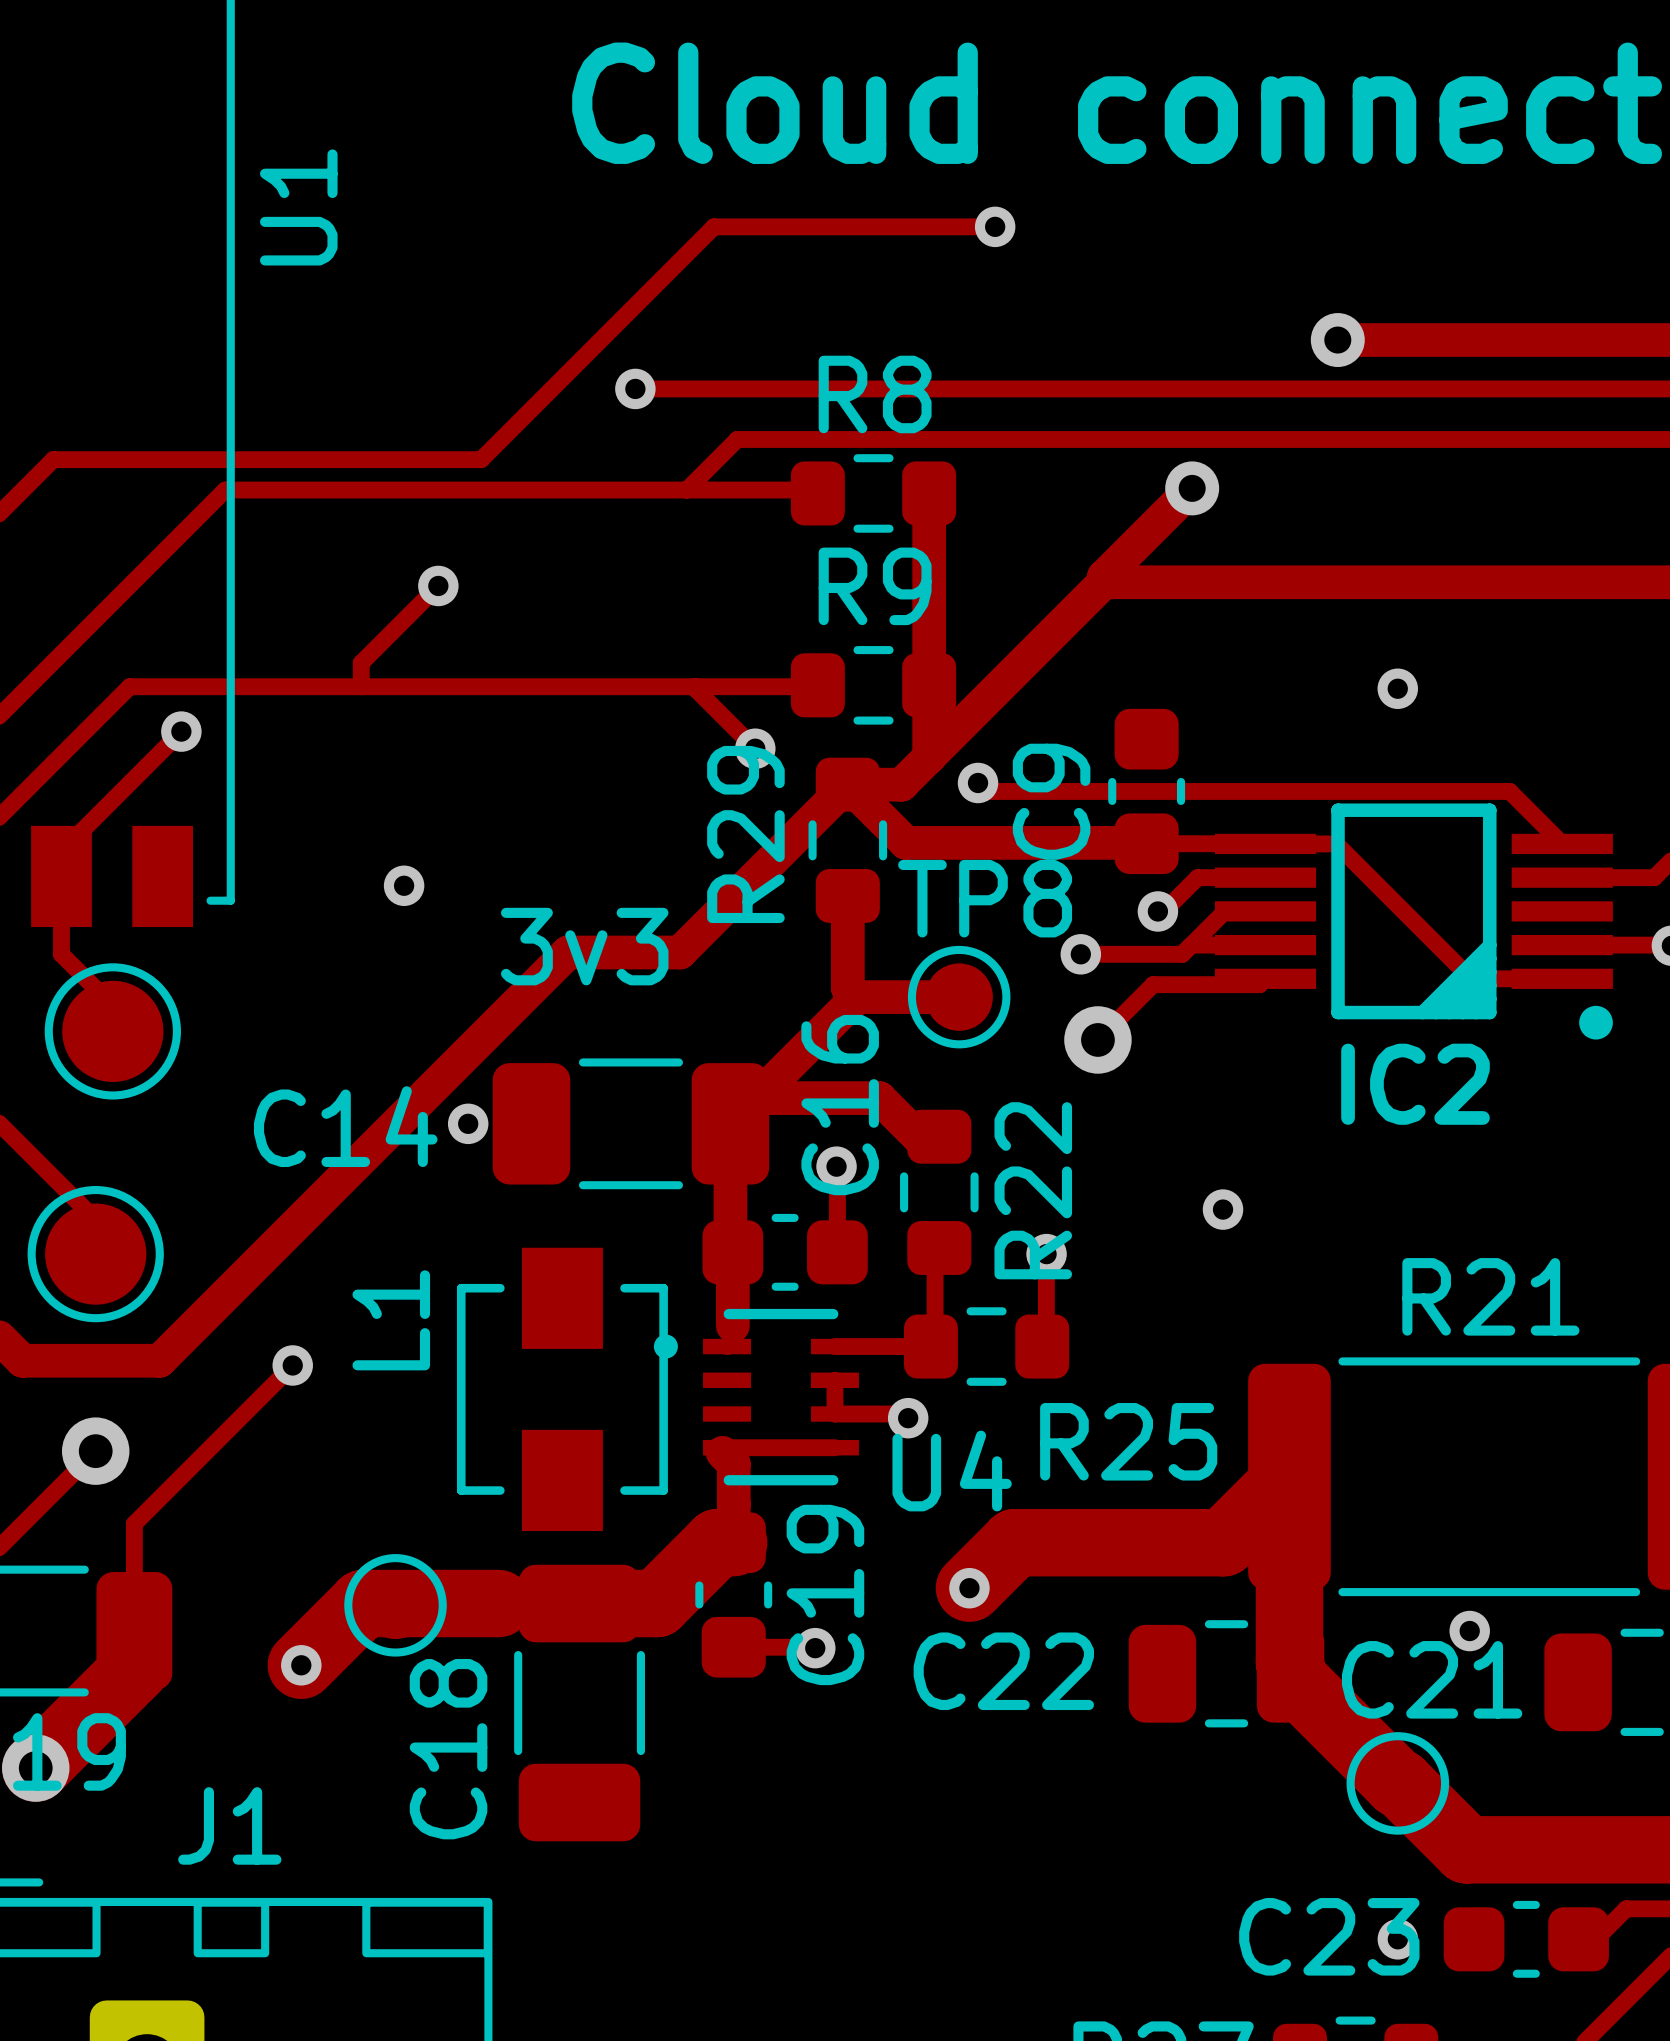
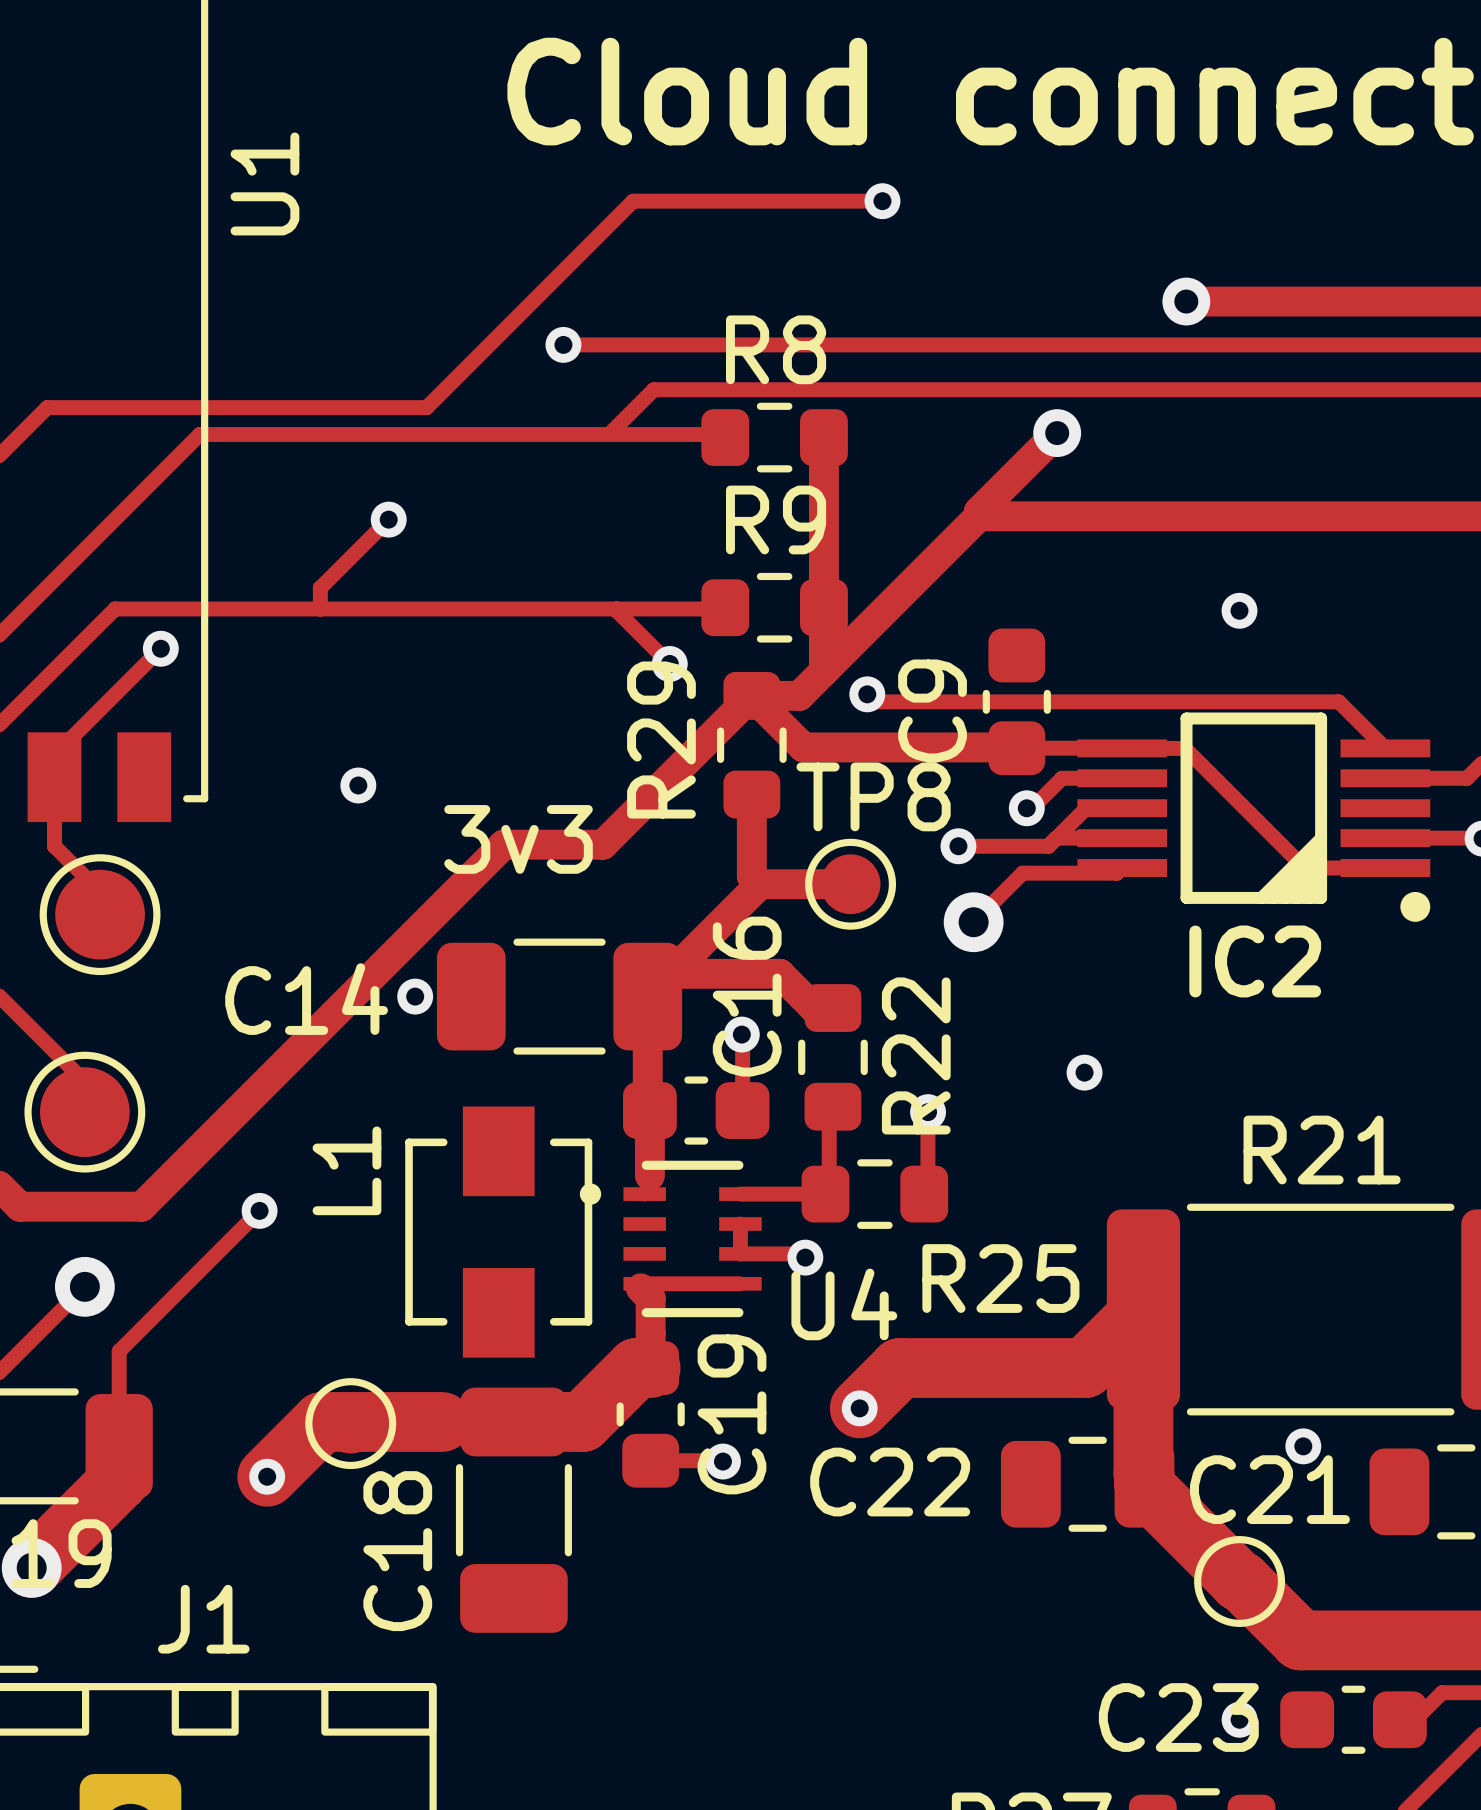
C16 name position: C16 (840, 1105) -> C16 (747, 996)

